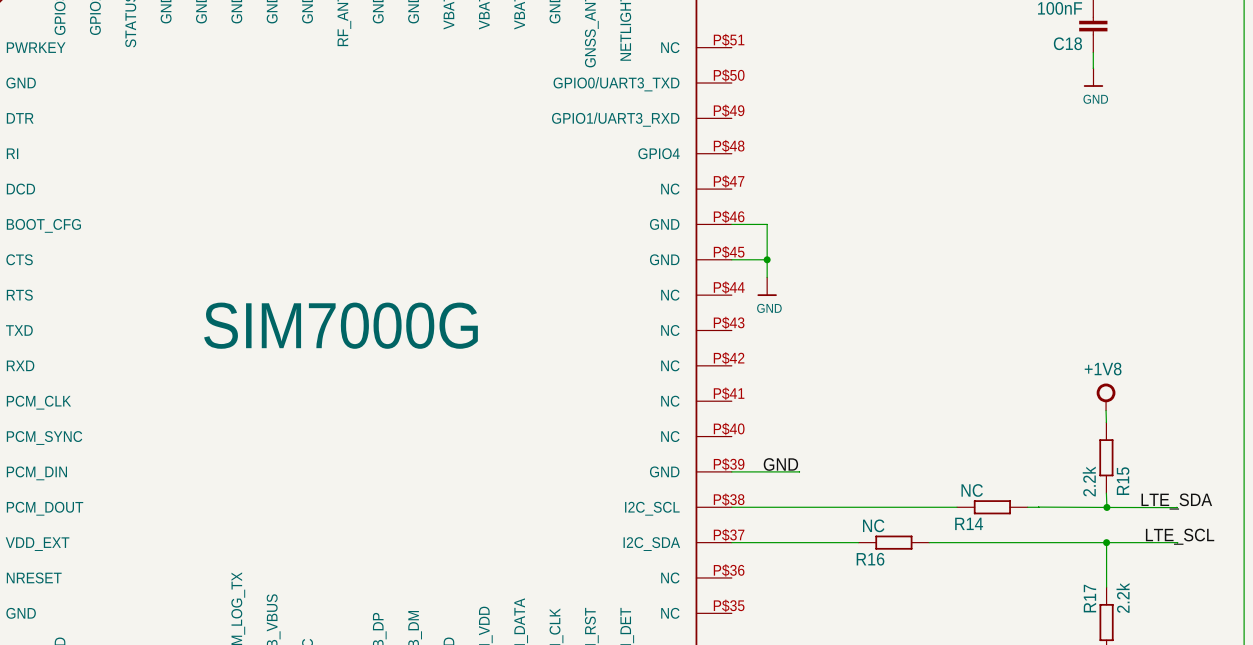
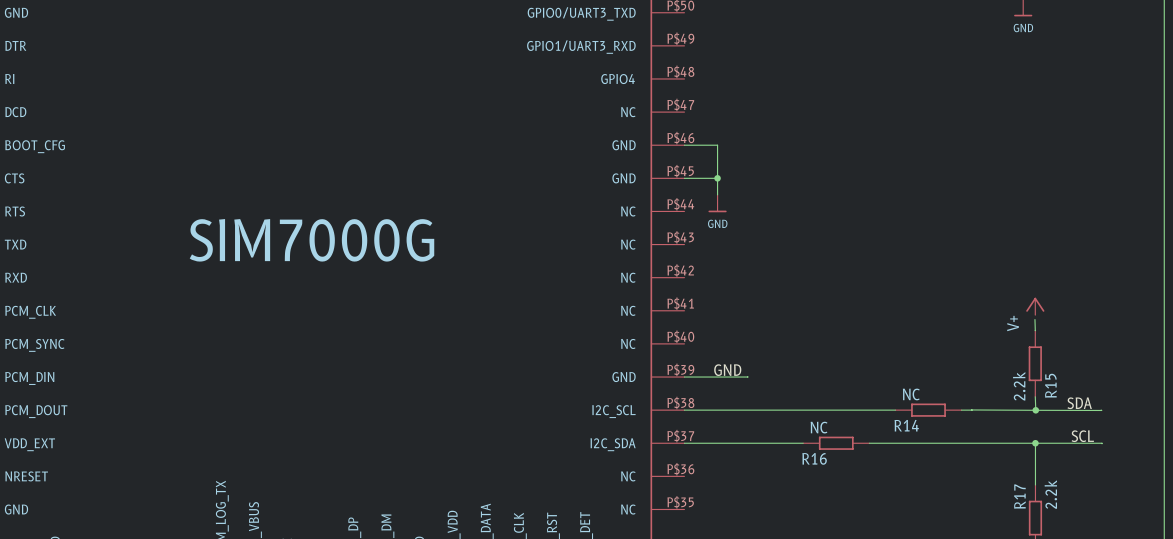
power symbol: +1V8 (1106, 397) -> V+ (1035, 306)
label: LTE_SDA (1176, 501) -> SDA (1079, 403)
label: LTE_SCL (1180, 536) -> SCL (1082, 436)

